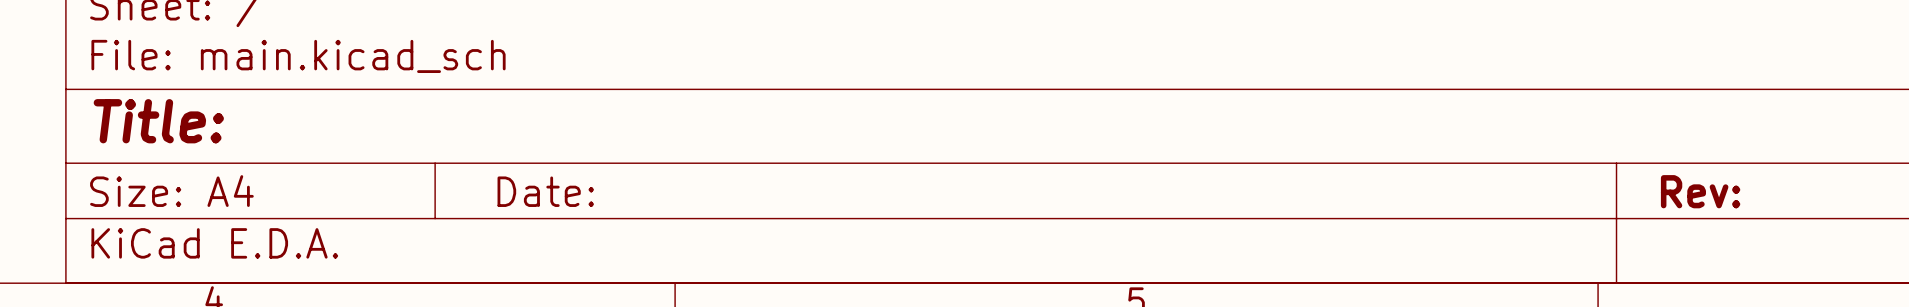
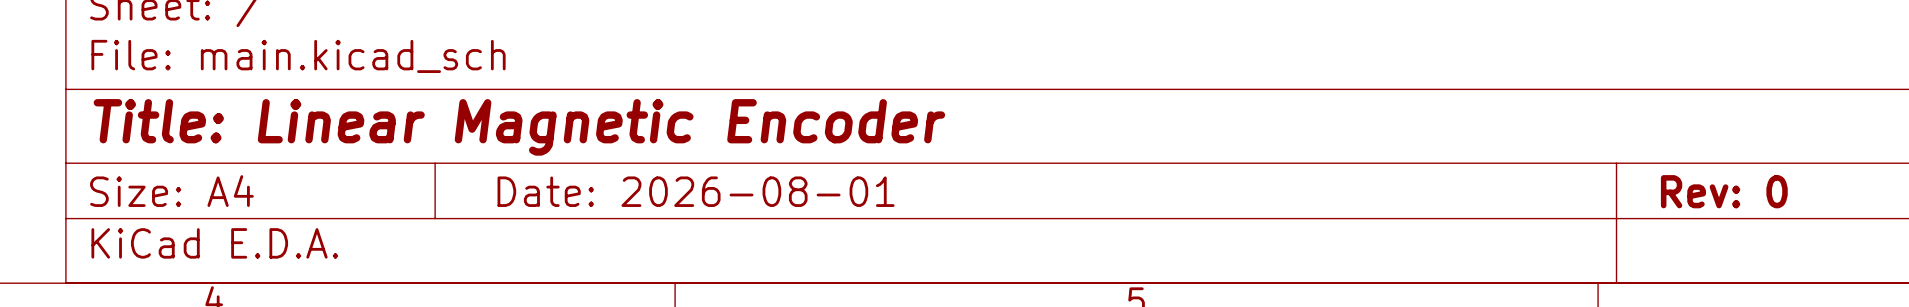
title block: Title: (158, 121) -> Title: Linear Magnetic Encoder (519, 127)
title block: Date: (545, 191) -> Date: 2026-08-01 (696, 191)
title block: Rev: (1700, 191) -> Rev: 0 (1724, 191)

